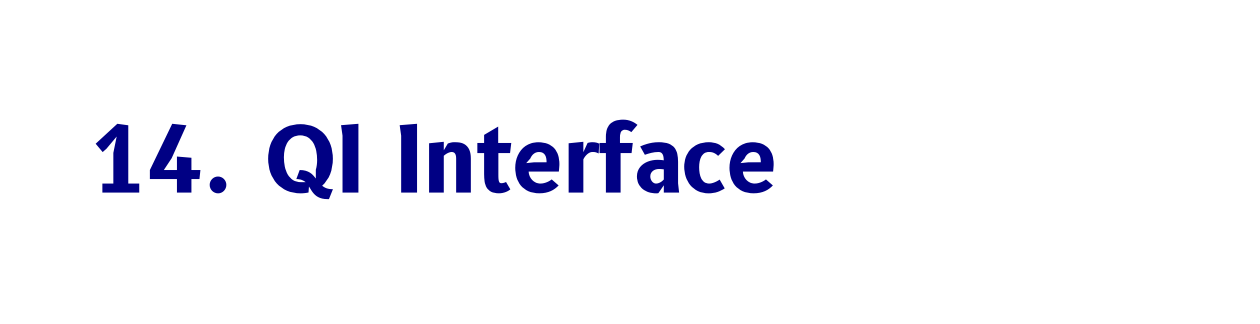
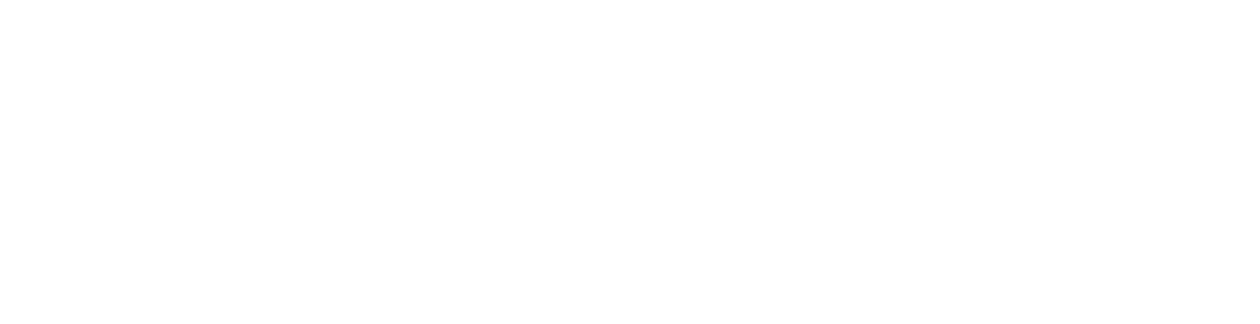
text: 14. QI Interface (434, 159) -> none

